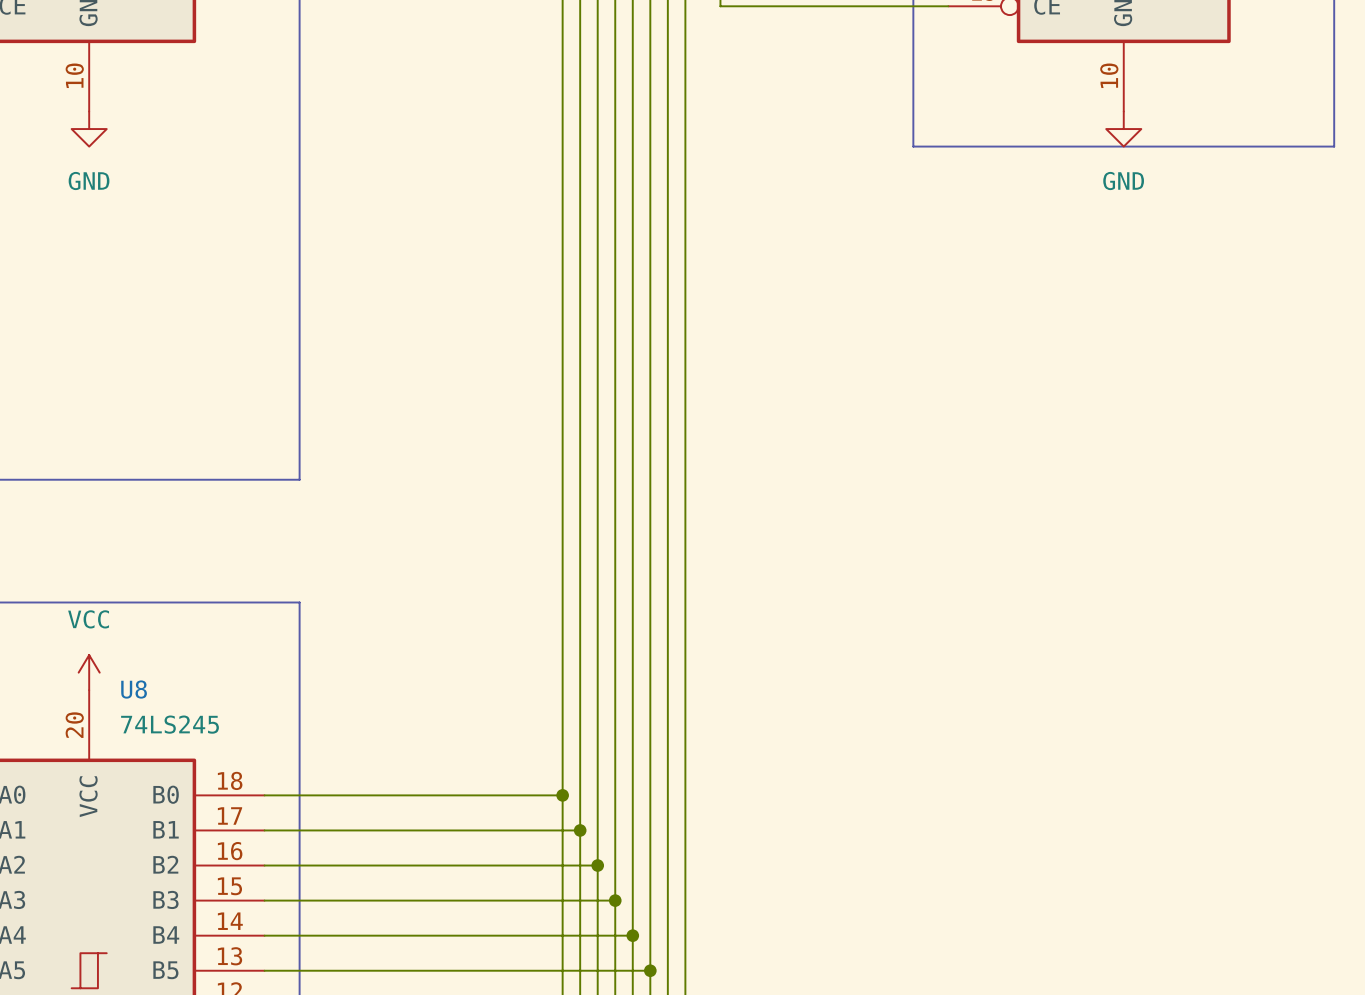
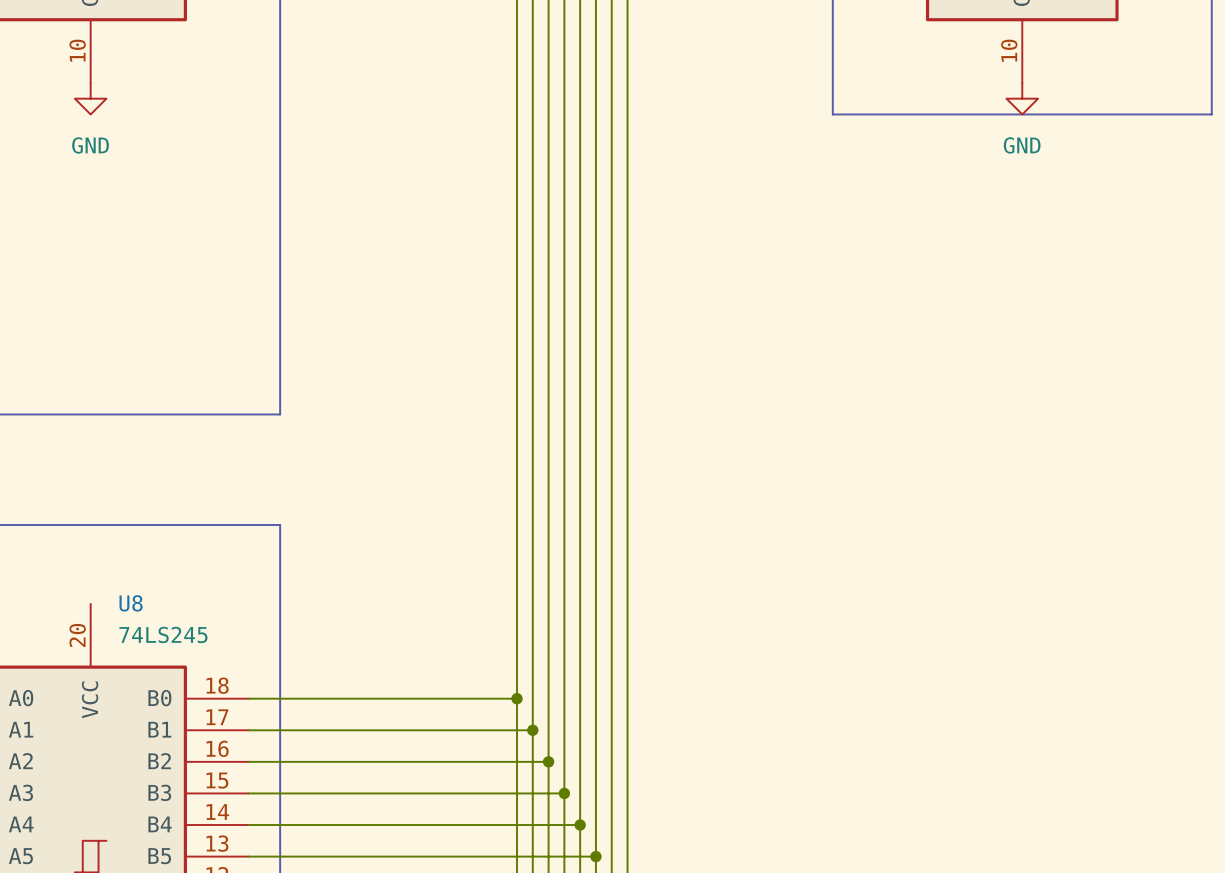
power symbol: VCC (89, 672) -> none

